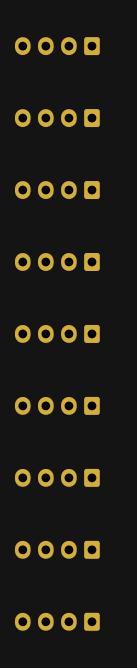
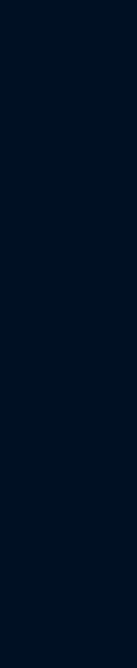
part: (57, 46) -> none
part: (57, 118) -> none
part: (57, 190) -> none
part: (57, 261) -> none
part: (57, 333) -> none
part: (57, 405) -> none
part: (57, 477) -> none
part: (57, 549) -> none
part: (57, 621) -> none

